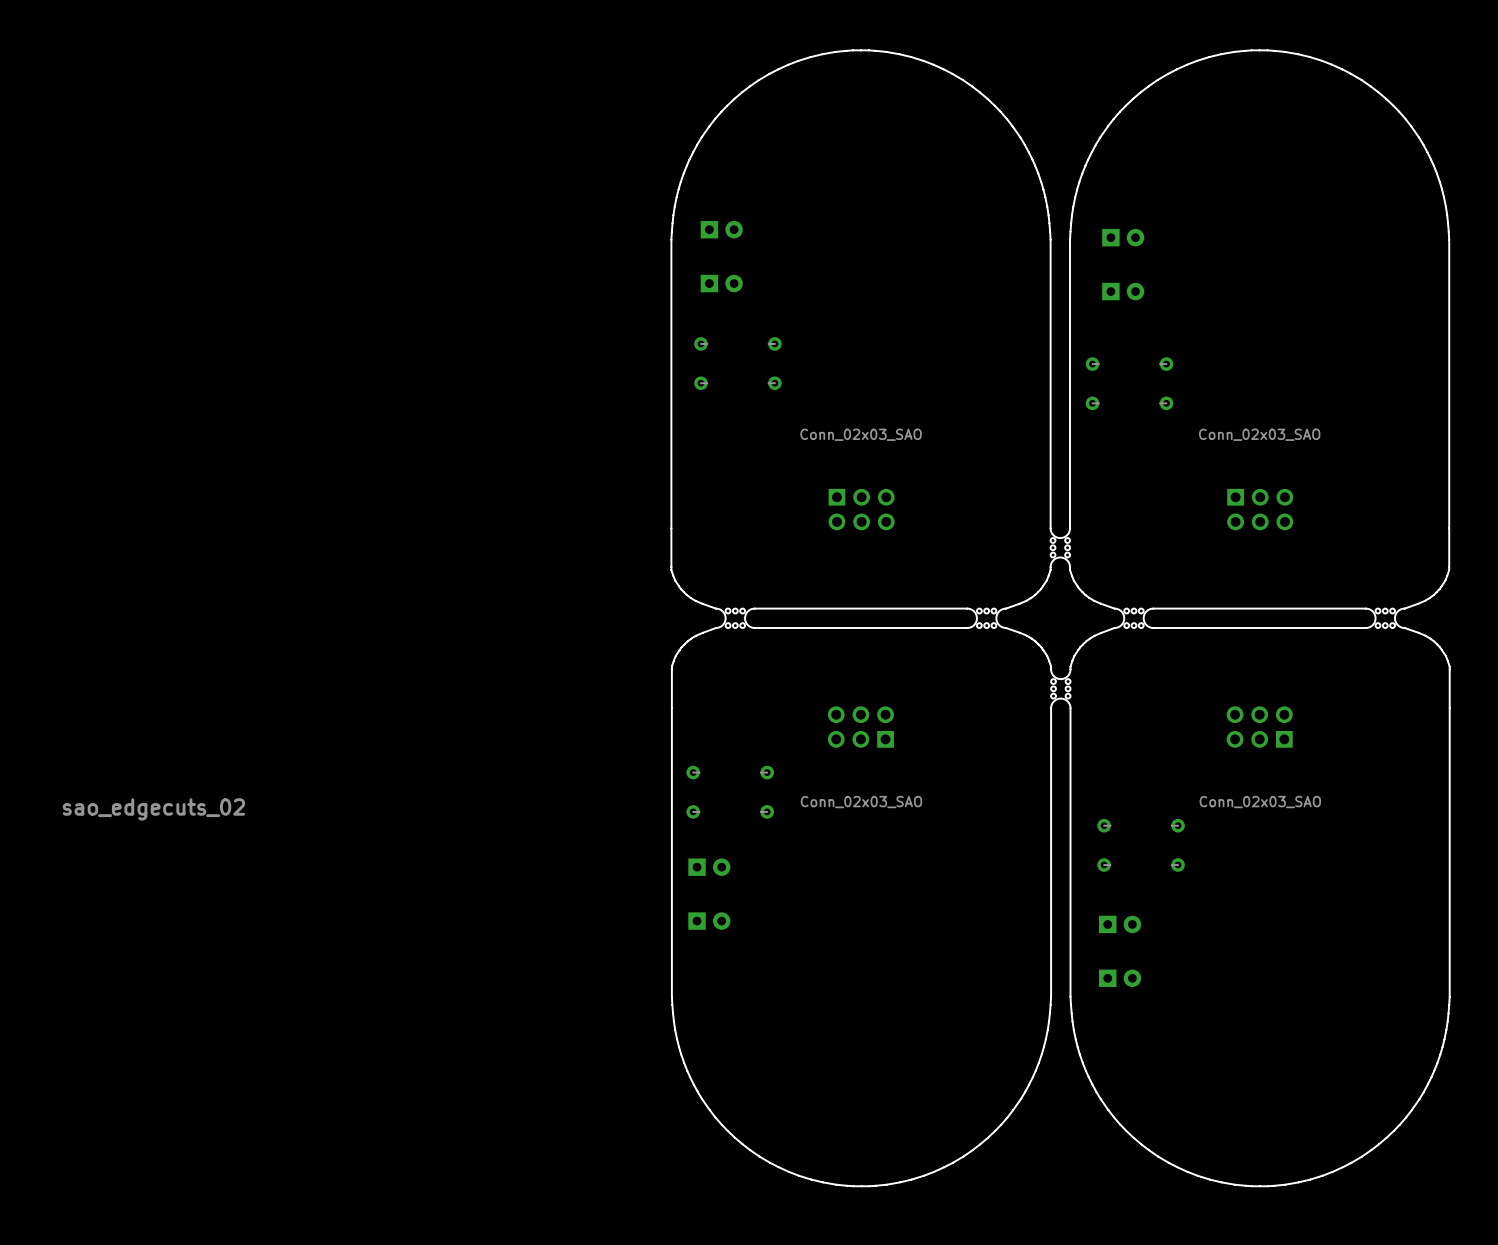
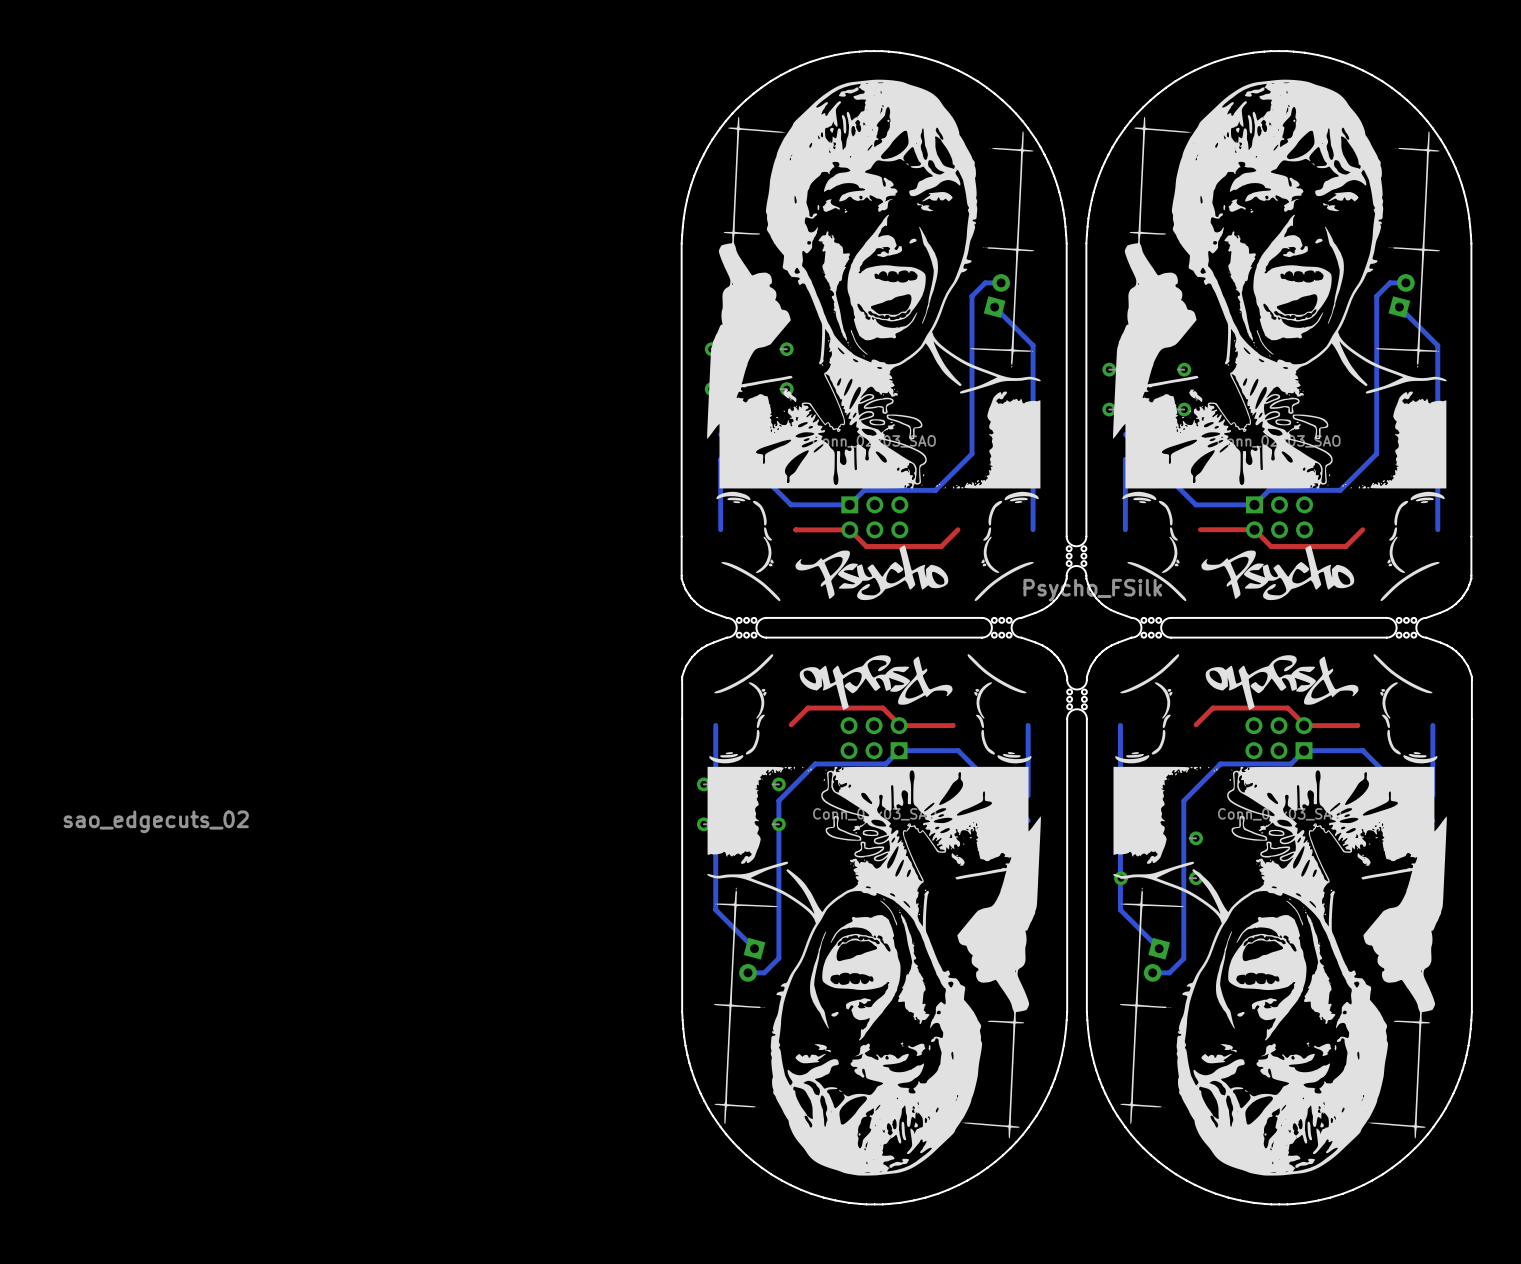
part: (721, 229) -> none
part: (1123, 237) -> none
bottom track: none -> (1001, 282) (985, 282) (971, 296) (971, 453) (935, 490) (864, 490) (849, 504) (791, 504) (720, 434)
bottom track: none -> (1405, 282) (1390, 282) (1376, 296) (1376, 453) (1340, 490) (1269, 490) (1254, 504) (1195, 504) (1125, 434)
part: (721, 283) -> none
part: none -> (996, 295)
part: (1123, 291) -> none
part: none -> (1401, 295)
bottom track: none -> (994, 307) (1033, 345) (1033, 529)
bottom track: none -> (1399, 307) (1437, 345) (1437, 529)
bottom track: none -> (720, 459) (720, 529)
bottom track: none -> (1125, 459) (1125, 529)
top track: none -> (795, 529) (849, 529) (866, 546) (941, 546) (958, 529)
top track: none -> (1200, 529) (1254, 529) (1271, 546) (1345, 546) (1362, 529)
Psycho_FSilk: none -> (1076, 627)
top track: none -> (899, 724) (882, 708) (807, 708) (791, 724)
top track: none -> (1304, 724) (1287, 708) (1212, 708) (1196, 724)
bottom track: none -> (715, 725) (715, 909) (754, 948)
top track: none -> (953, 725) (899, 725)
bottom track: none -> (1028, 725) (1028, 795)
bottom track: none -> (1120, 725) (1120, 909) (1159, 948)
top track: none -> (1357, 725) (1304, 725)
bottom track: none -> (1432, 725) (1432, 795)
bottom track: none -> (1304, 750) (1363, 750) (1432, 820)
bottom track: none -> (1304, 750) (1290, 763) (1220, 763) (1184, 800)
bottom track: none -> (1183, 800) (1183, 958) (1169, 972) (1152, 972)
bottom track: none -> (1028, 820) (958, 750) (899, 750) (885, 763) (815, 763) (778, 800) (778, 958) (764, 972) (748, 972)
part: (709, 867) -> none
part: (709, 921) -> none
part: (1120, 924) -> none
part: none -> (752, 959)
part: none -> (1156, 959)
part: (1120, 978) -> none

